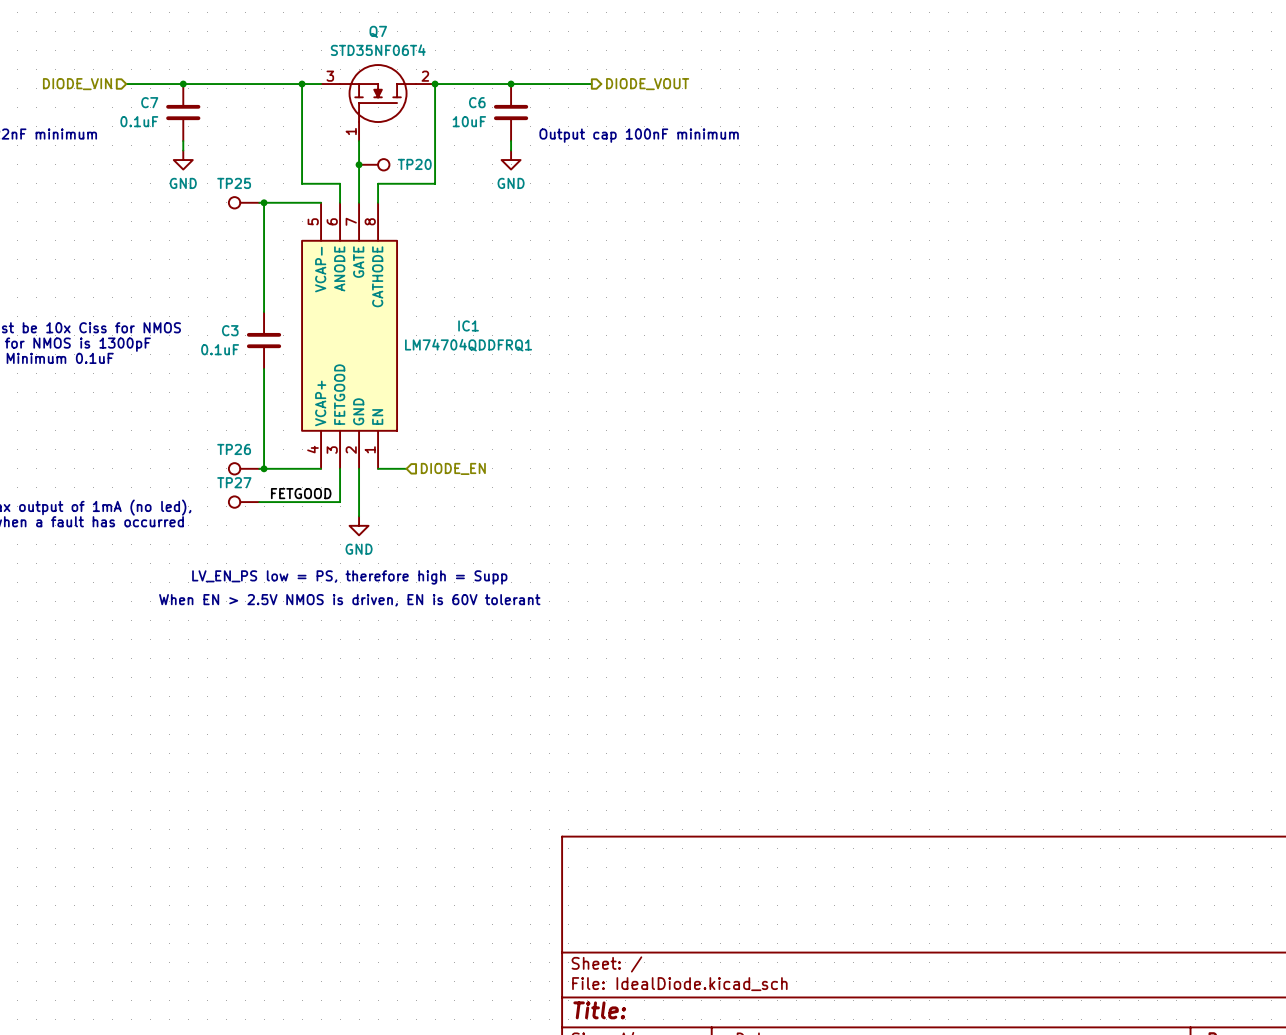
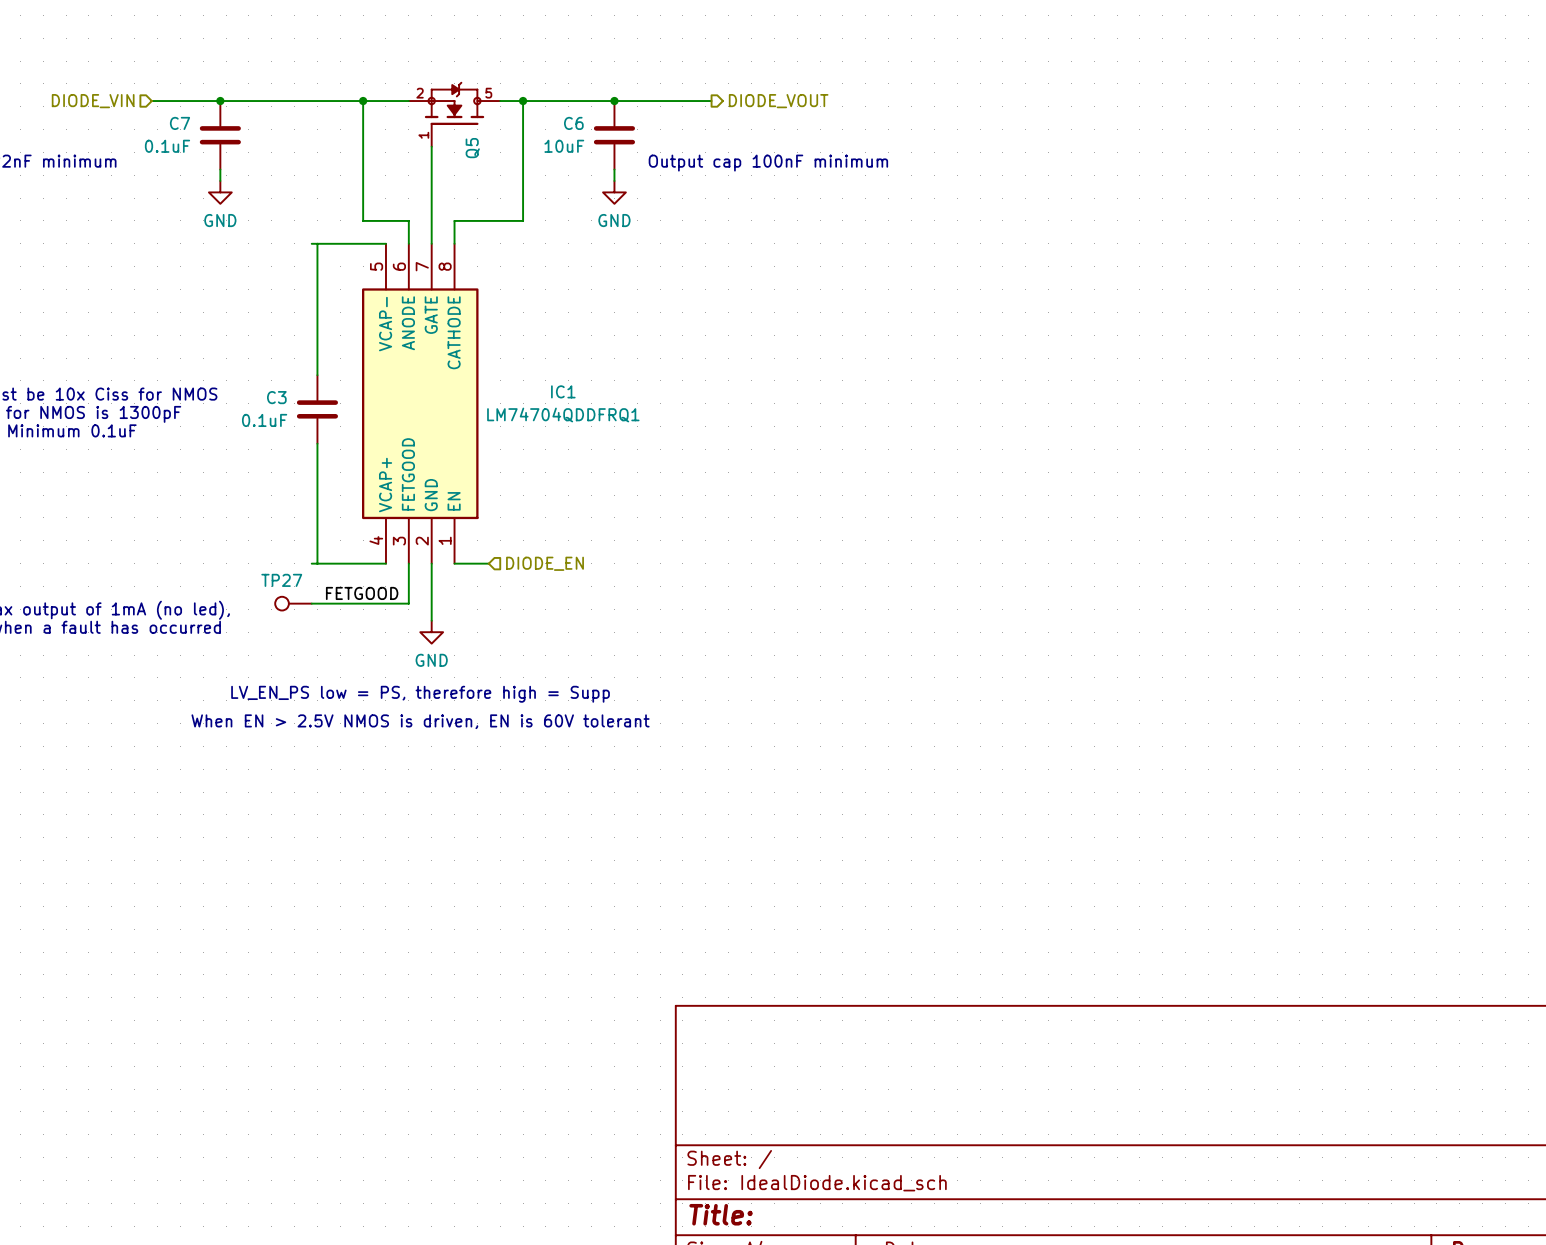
Q5: none -> (454, 114)
Q7: STD35NF06T4 (378, 102) -> none
junction: (359, 164) -> none
TP20: (374, 164) -> none
TP25: (244, 202) -> none
junction: (264, 202) -> none
TP26: (244, 468) -> none
junction: (264, 468) -> none

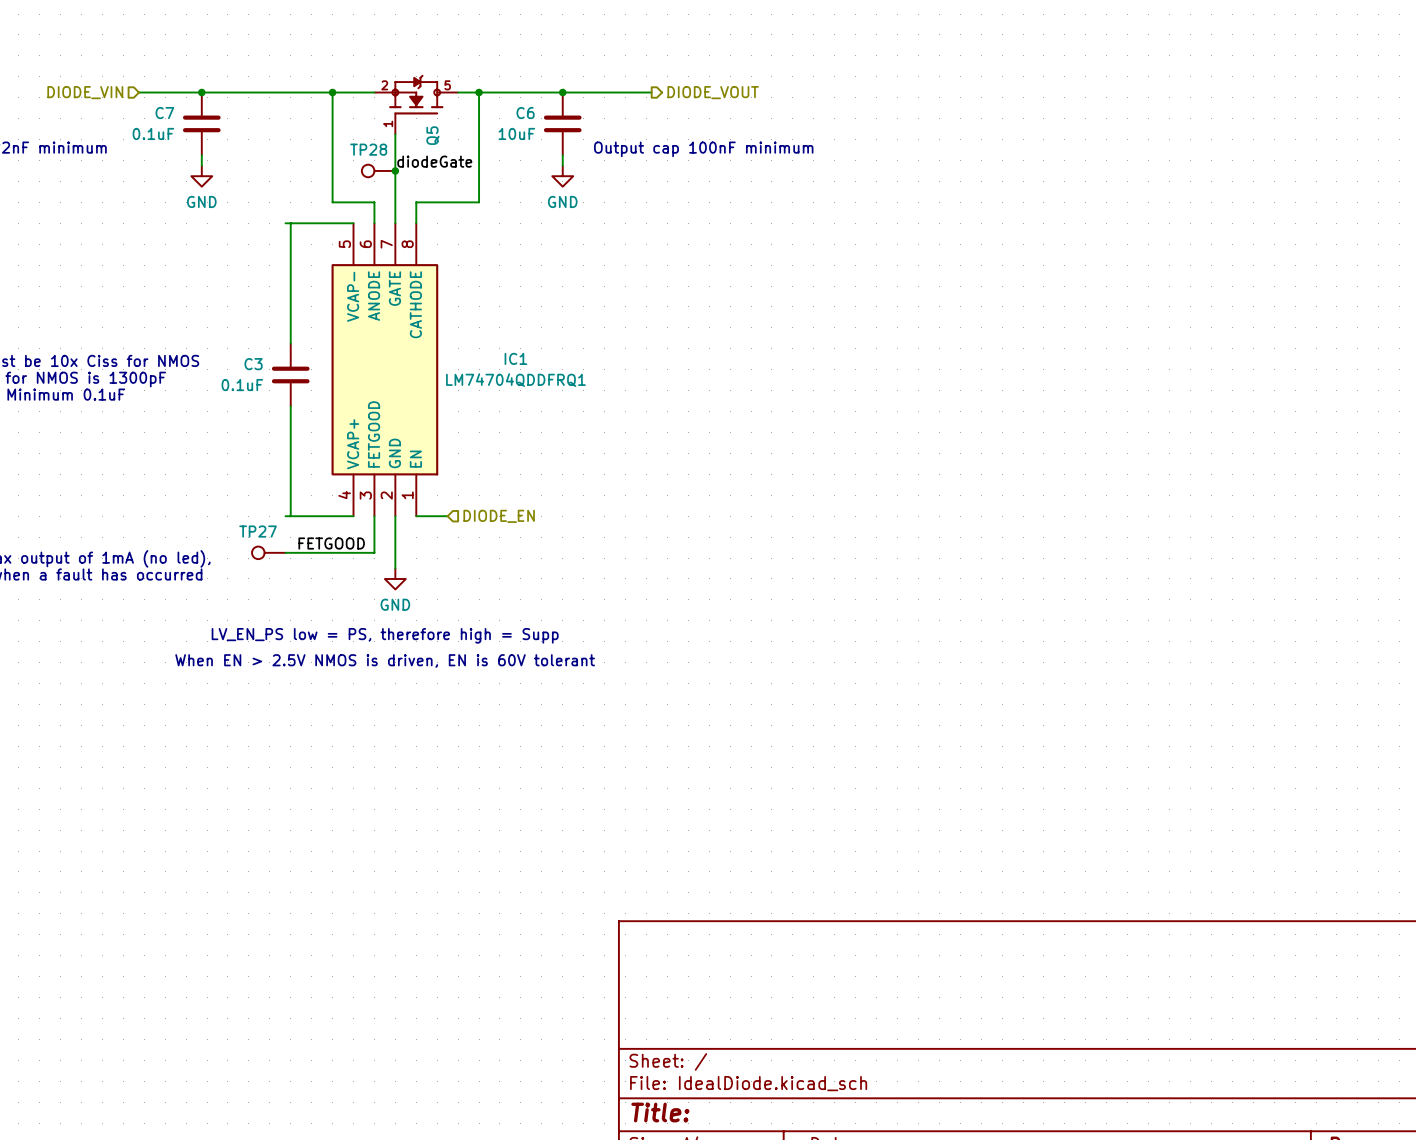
label: none -> diodeGate (434, 161)
TP28: none -> (378, 170)
junction: none -> (395, 170)

